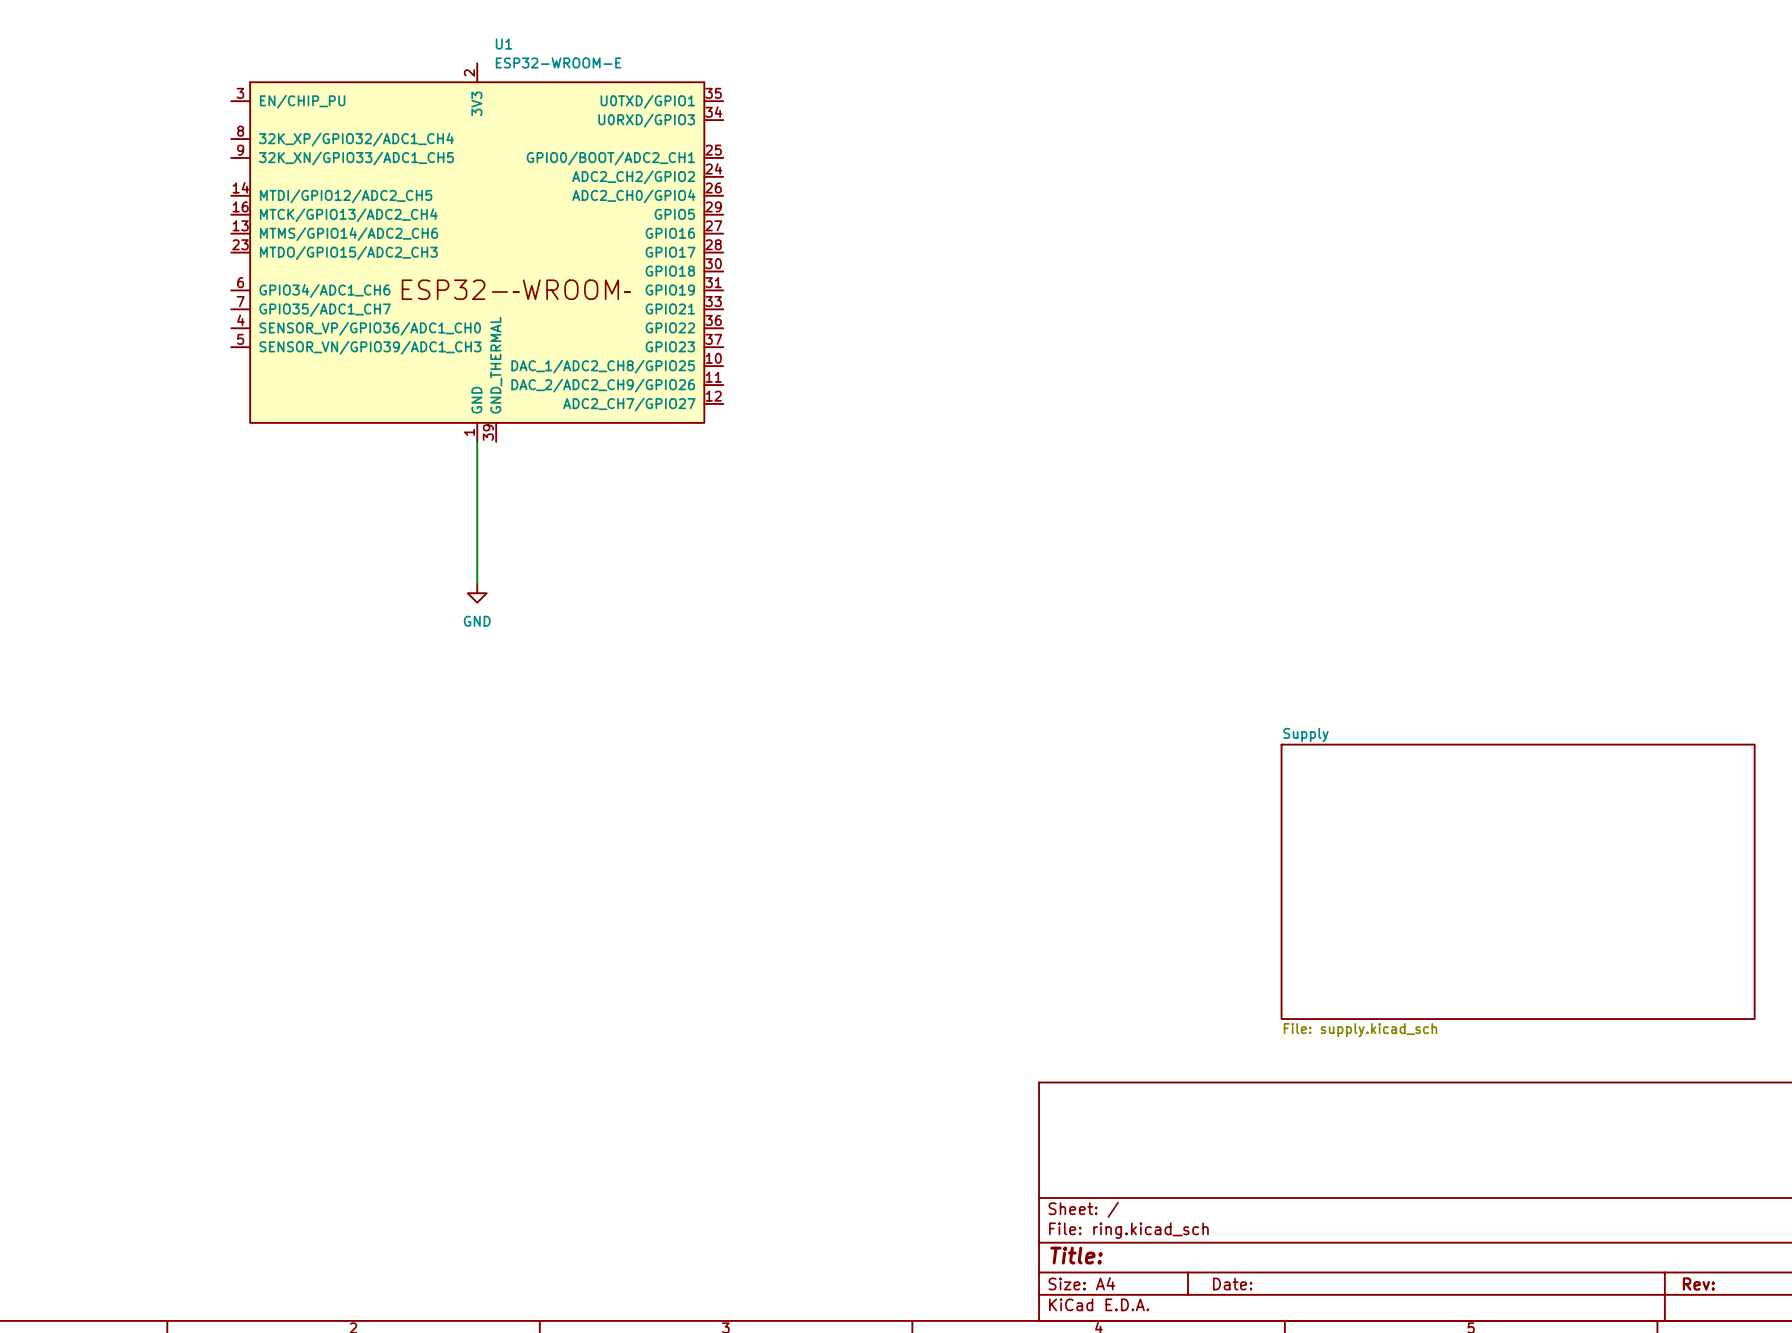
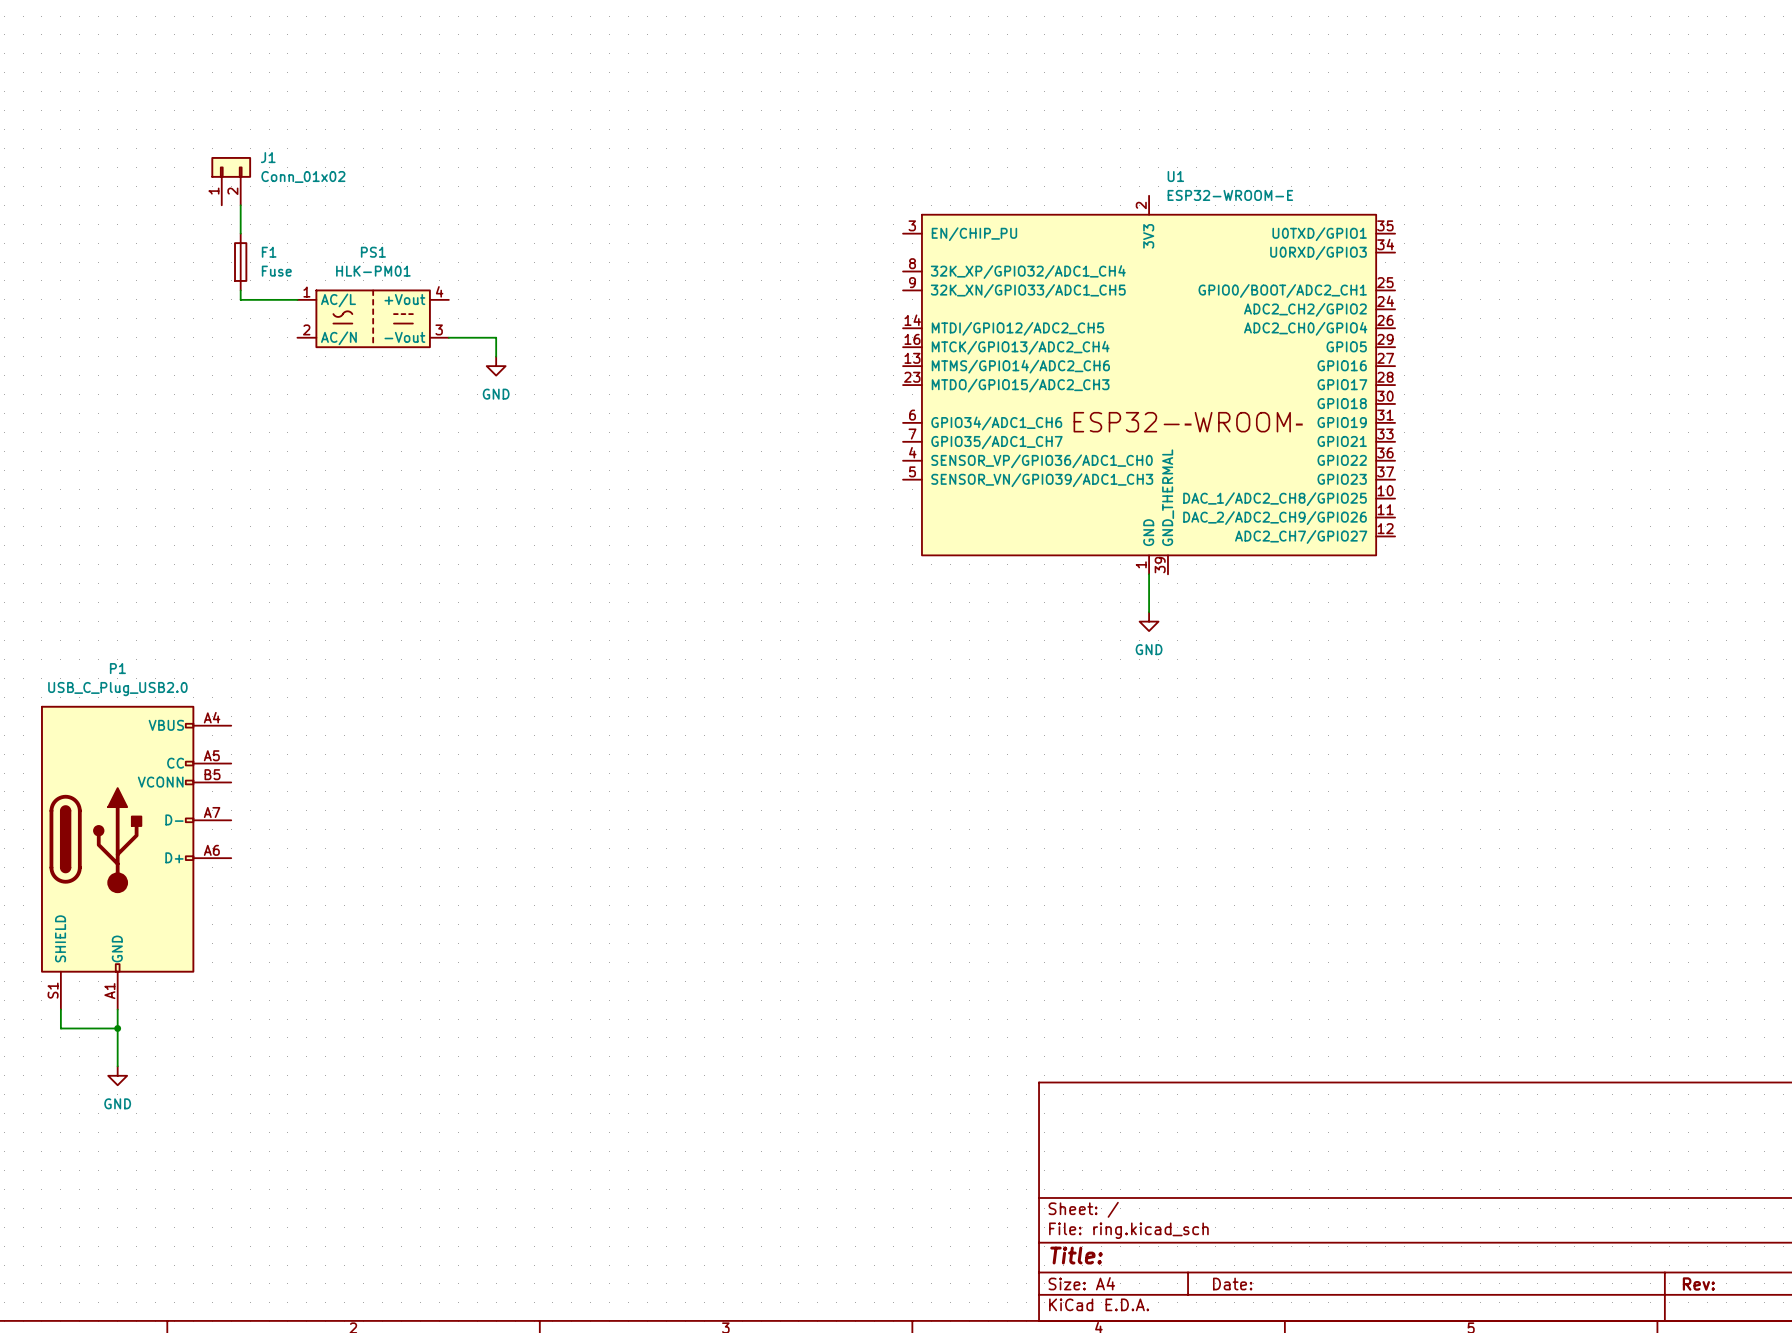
J1: none -> Conn_01x02 (231, 181)
wire: none -> (240, 205) (240, 233)
U1 position: (477, 252) -> (1149, 385)
F1: none -> Fuse (240, 262)
PS1: none -> HLK-PM01 (373, 318)
power symbol: none -> GND (496, 366)
wire: (477, 441) (477, 583) -> none
wire: none -> (1149, 574) (1149, 612)
power symbol: GND (477, 593) -> none
power symbol: none -> GND (1149, 621)
P1: none -> USB_C_Plug_USB2.0 (136, 857)
sheet Supply: File: supply.kicad_sch (1518, 881) -> none
wire: none -> (60, 1009) (60, 1028) (117, 1028)
wire: none -> (117, 1009) (117, 1066)
junction: none -> (117, 1028)
power symbol: none -> GND (117, 1075)

